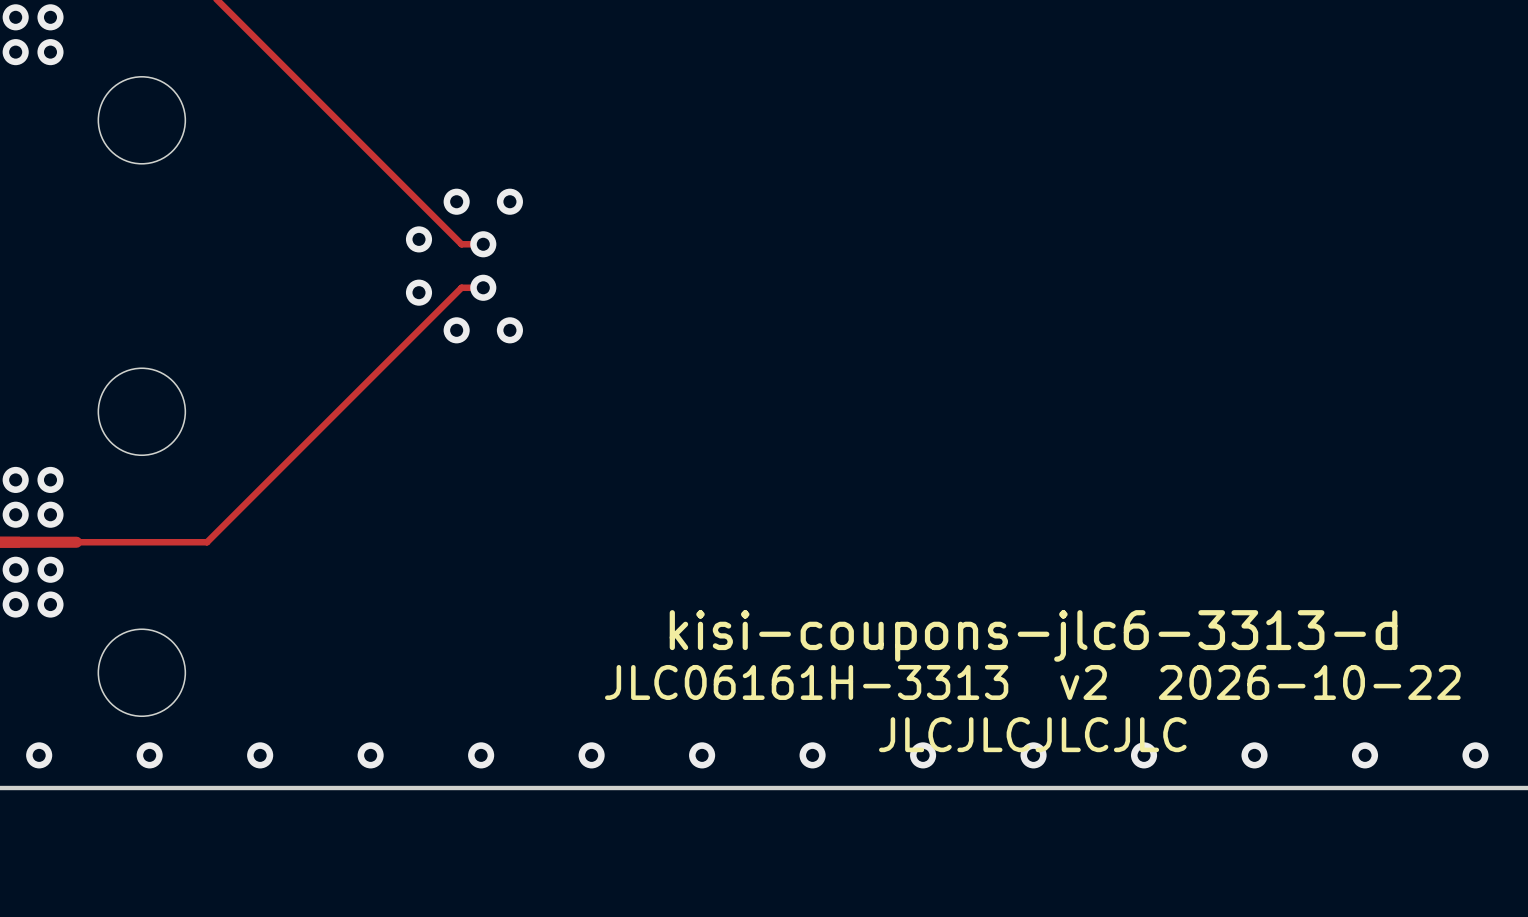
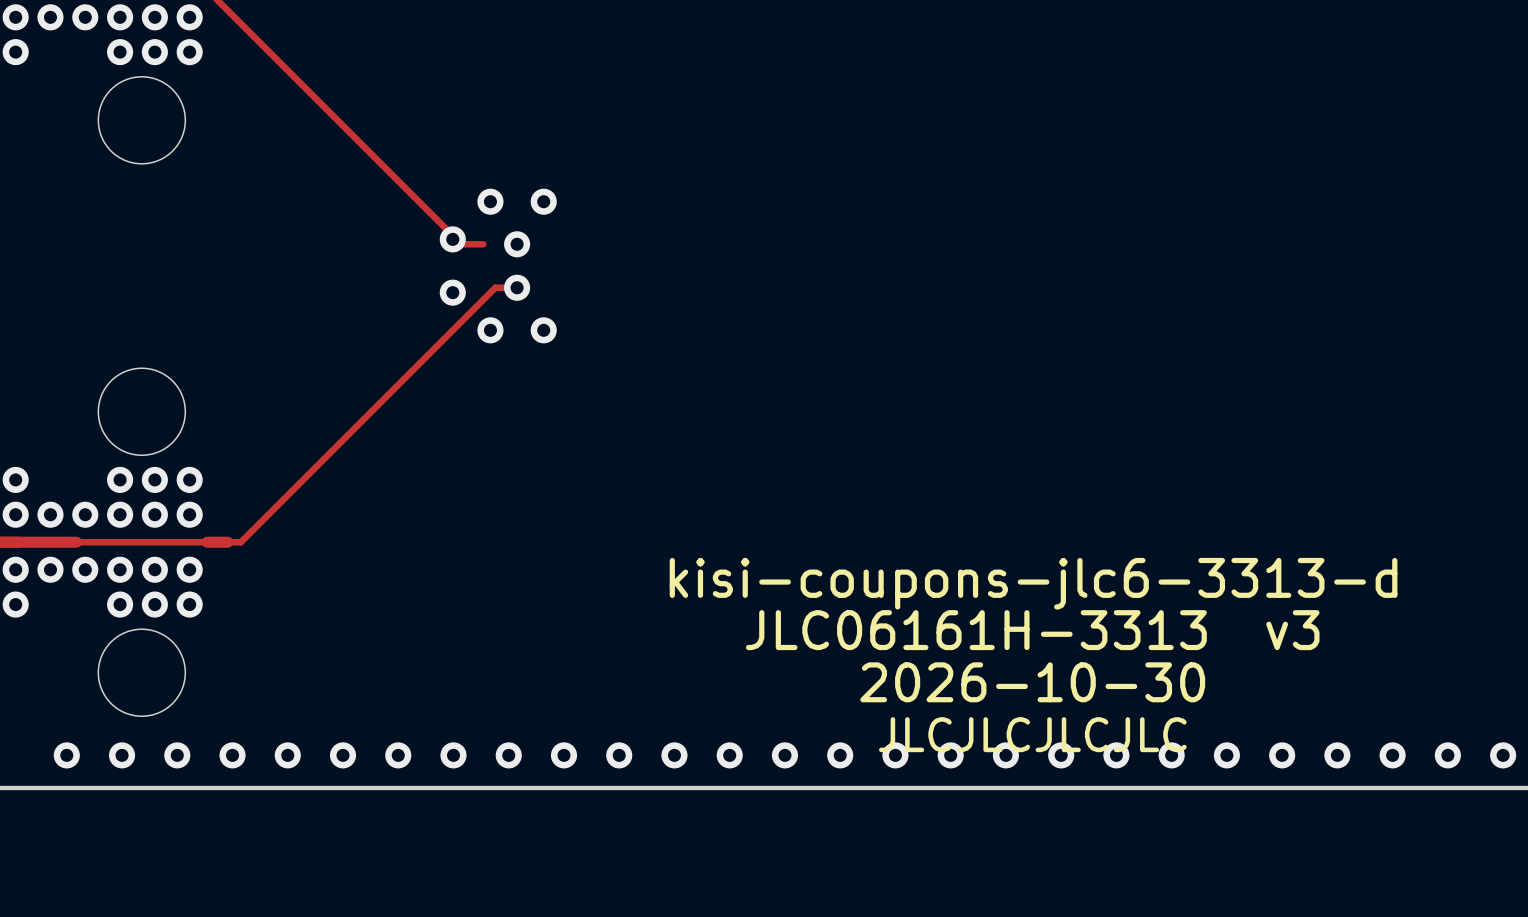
via: none -> (85, 17)
via: none -> (120, 17)
via: none -> (154, 17)
via: none -> (189, 17)
via: (50, 52) -> none
via: none -> (120, 52)
via: none -> (154, 52)
via: none -> (189, 52)
via: (456, 201) -> none
via position: (509, 201) -> (490, 201)
via: none -> (543, 201)
via: (418, 239) -> none
via: none -> (452, 239)
via: (483, 244) -> none
via: none -> (517, 244)
top track: (483, 287) (461, 287) (207, 542) -> (517, 287) (495, 287) (240, 542) (207, 542)
via: (483, 287) -> none
via: none -> (517, 287)
via: (418, 292) -> none
via: none -> (452, 292)
via: (456, 330) -> none
via position: (509, 330) -> (490, 330)
via: none -> (543, 330)
via: (50, 479) -> none
via: none -> (120, 479)
via: none -> (154, 479)
via: none -> (189, 479)
via: none -> (85, 514)
via: none -> (120, 514)
via: none -> (154, 514)
via: none -> (189, 514)
via: none -> (85, 569)
via: none -> (120, 569)
via: none -> (154, 569)
via: none -> (189, 569)
text: none -> kisi-coupons-jlc6-3313-d (1033, 583)
via: (50, 604) -> none
via: none -> (120, 604)
via: none -> (154, 604)
via: none -> (189, 604)
text: kisi-coupons-jlc6-3313-d (1033, 635) -> JLC06161H-3313 v3 (1032, 630)
text: JLC06161H-3313 v2 2026-10-22 (1032, 682) -> 2026-10-30 (1032, 682)
via position: (39, 755) -> (66, 755)
via: none -> (122, 755)
via: (149, 755) -> none
via: none -> (177, 755)
via: none -> (232, 755)
via: (260, 755) -> none
via: none -> (287, 755)
via: none -> (343, 755)
via: (370, 755) -> none
via: none -> (398, 755)
via: none -> (453, 755)
via: (481, 755) -> none
via: none -> (508, 755)
via: none -> (563, 755)
via: (591, 755) -> none
via: none -> (619, 755)
via: none -> (674, 755)
via: (702, 755) -> none
via: none -> (729, 755)
via: none -> (784, 755)
via: (812, 755) -> none
via: none -> (840, 755)
via: none -> (895, 755)
via: (923, 755) -> none
via: none -> (950, 755)
via: none -> (1005, 755)
via: (1033, 755) -> none
via: none -> (1061, 755)
via: none -> (1116, 755)
via: (1144, 755) -> none
via: none -> (1171, 755)
via: none -> (1226, 755)
via: (1254, 755) -> none
via: none -> (1282, 755)
via: none -> (1337, 755)
via: (1365, 755) -> none
via: none -> (1392, 755)
via: none -> (1447, 755)
via: (1475, 755) -> none
via: none -> (1503, 755)

